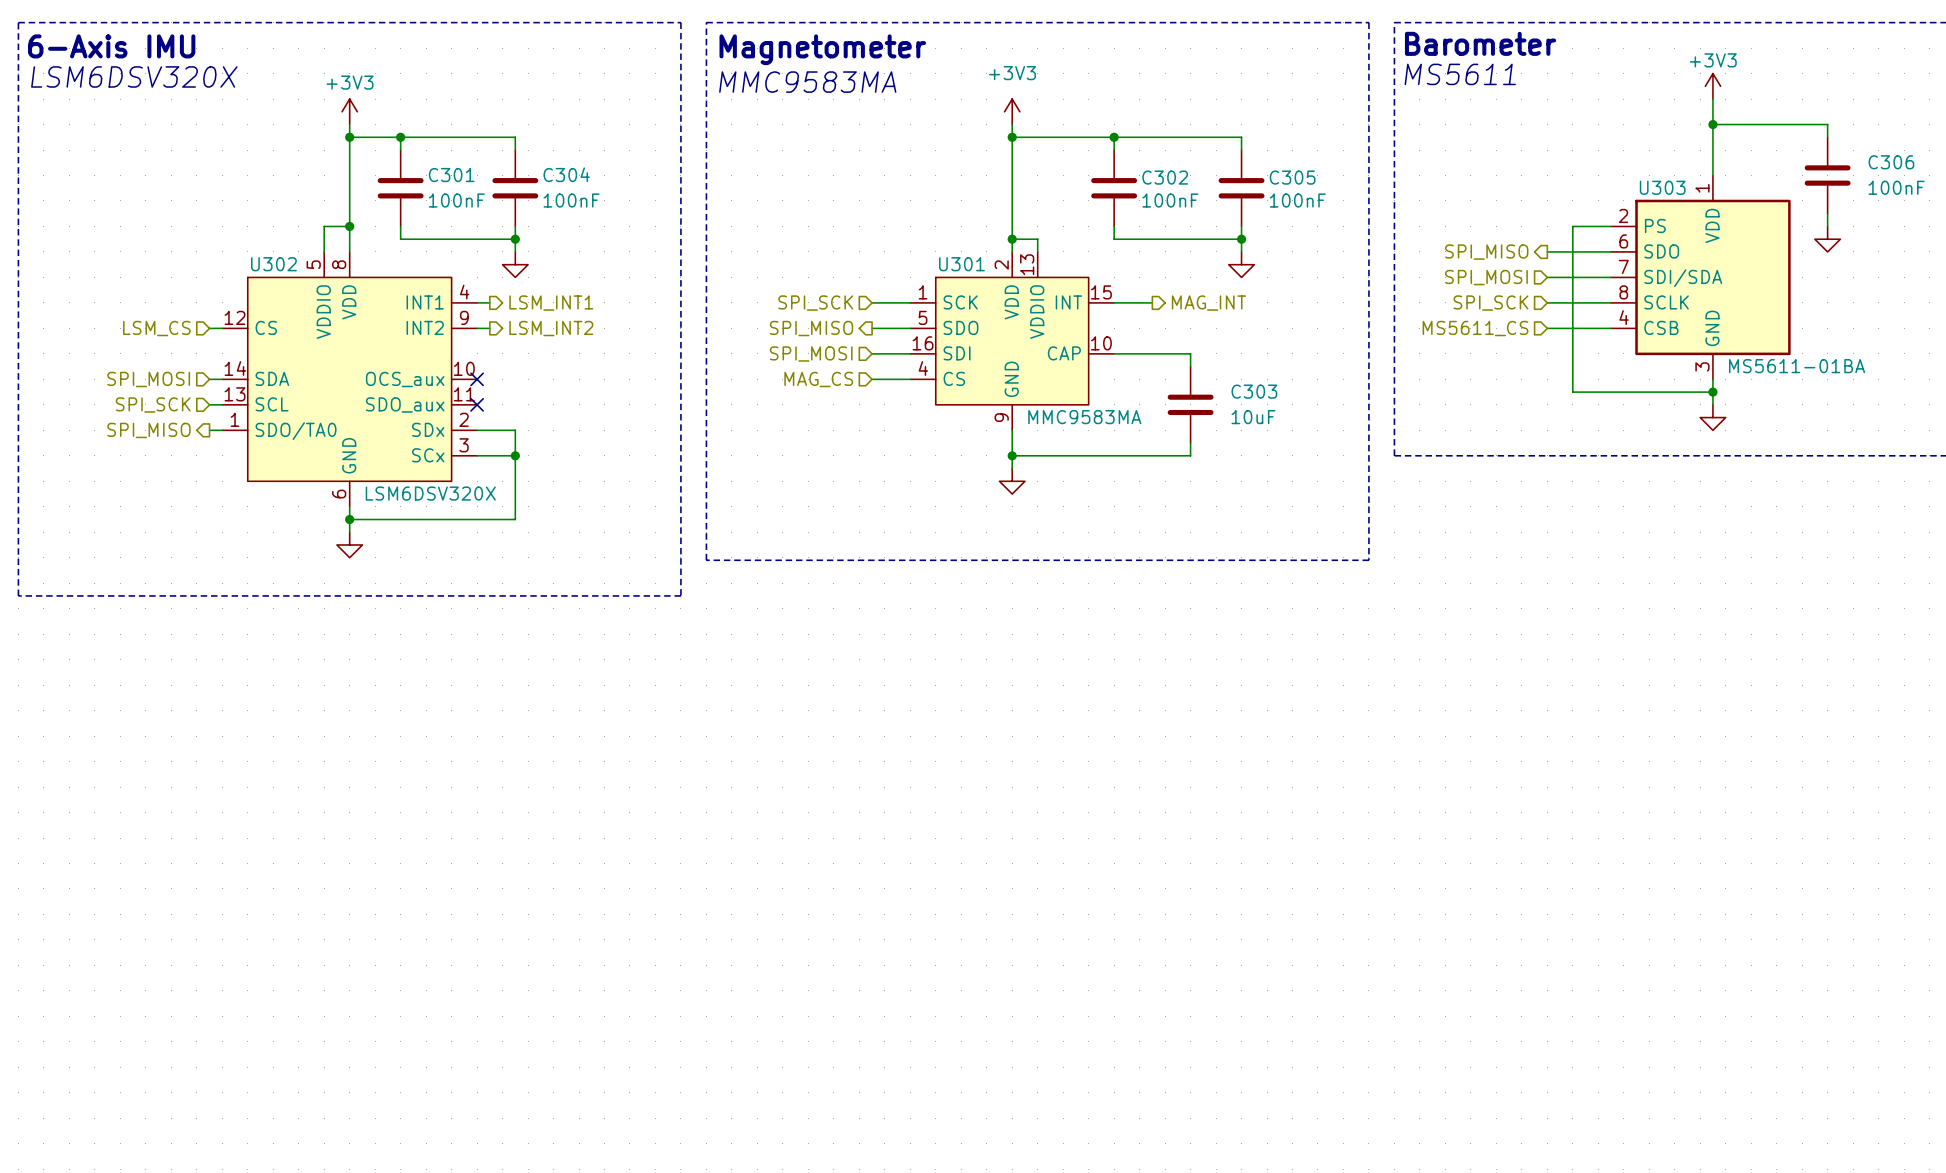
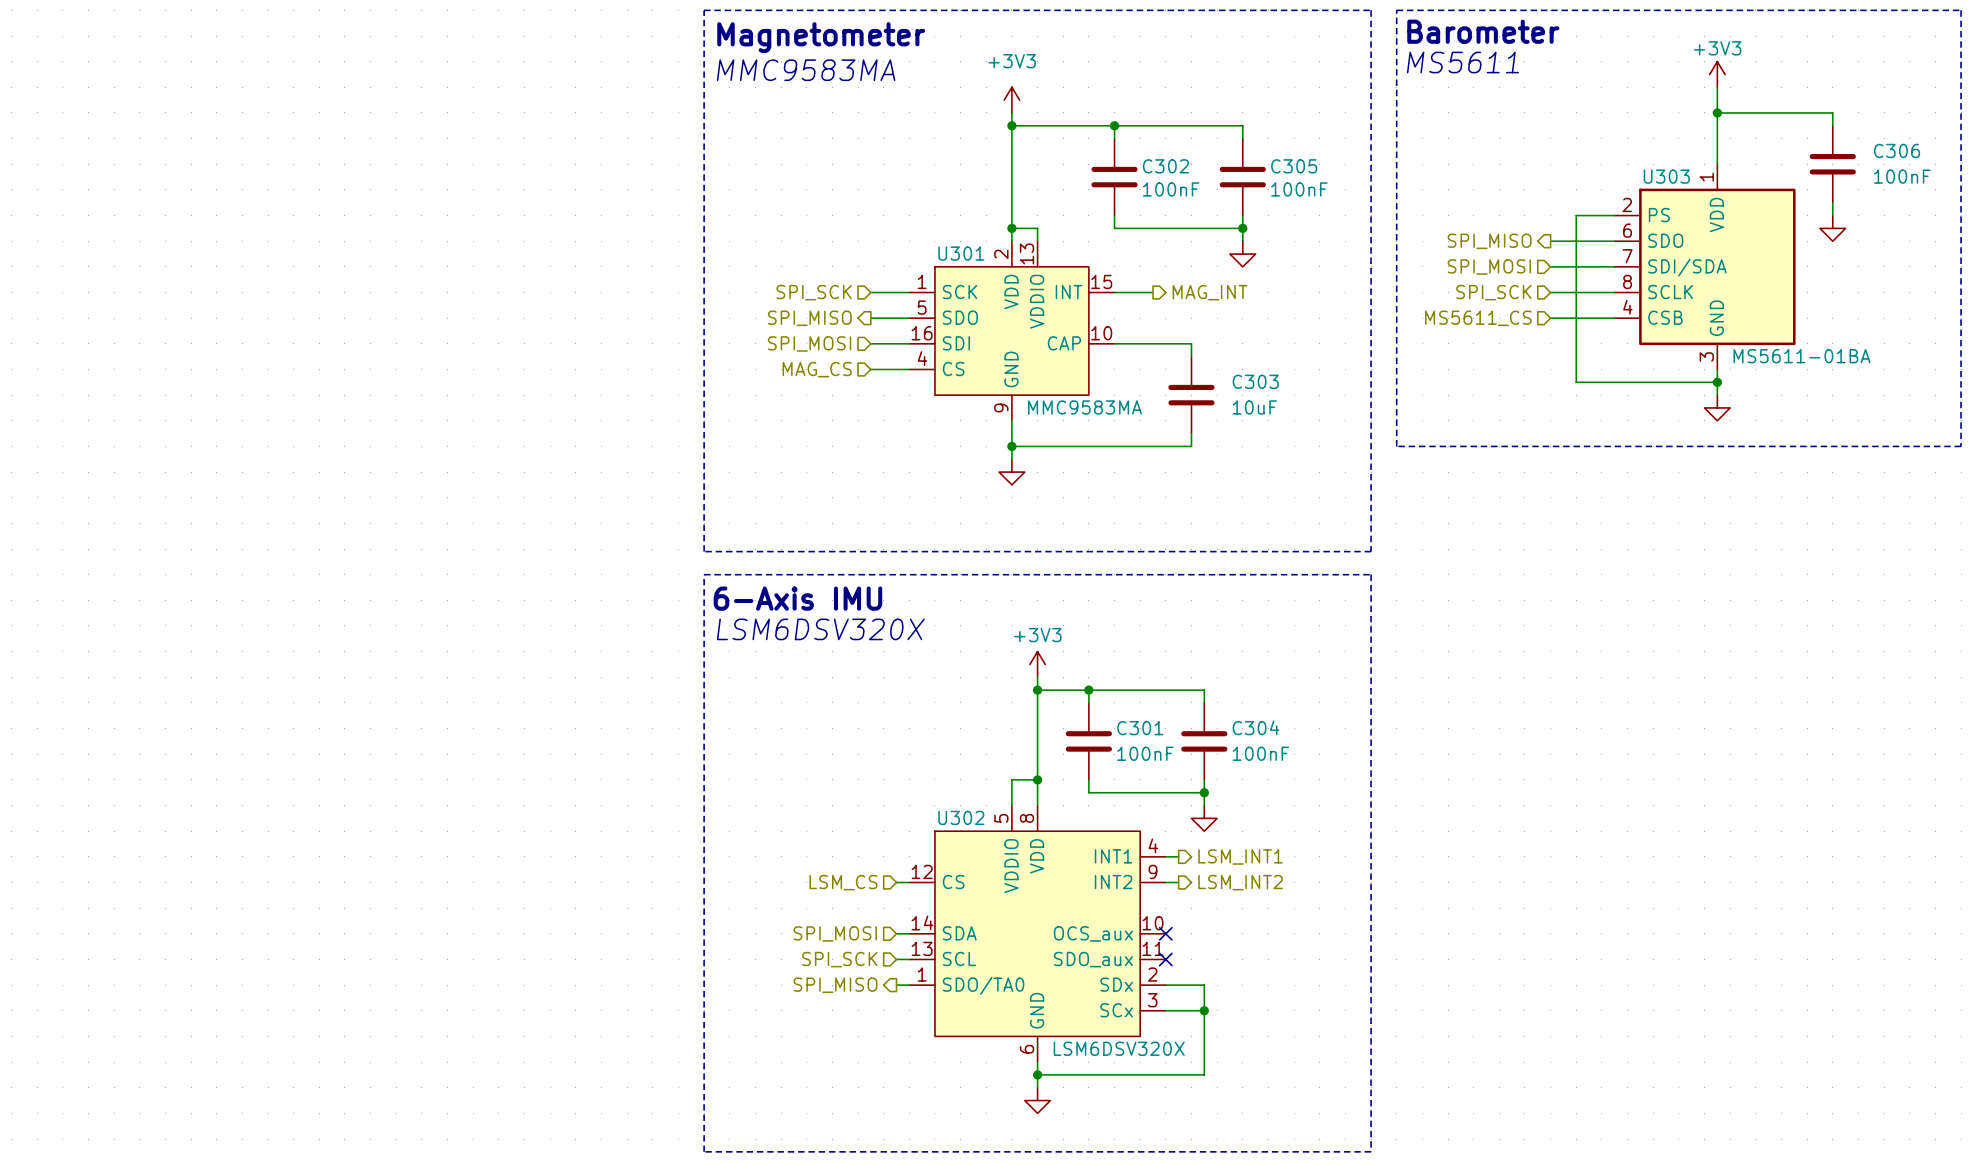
line: (18, 22) (680, 22) (680, 595) (18, 595) (18, 22) -> none
text: 6-Axis IMU (111, 46) -> none
text: LSM6DSV320X (134, 76) -> none
power symbol: +3V3 (349, 111) -> none
wire: (349, 124) (349, 251) -> none
wire: (349, 137) (515, 137) (515, 150) -> none
junction: (349, 137) -> none
wire: (400, 137) (400, 150) -> none
junction: (400, 137) -> none
C301 position: (400, 188) -> (1088, 741)
C304 position: (515, 188) -> (1204, 741)
wire: (349, 226) (324, 226) (324, 251) -> none
junction: (349, 226) -> none
wire: (400, 226) (400, 239) (515, 239) -> none
wire: (515, 226) (515, 251) -> none
junction: (515, 239) -> none
power symbol: (515, 264) -> none
wire: (477, 302) (489, 302) -> none
hierarchical label: LSM_INT1 (551, 303) -> none
hierarchical label: LSM_CS (156, 328) -> none
wire: (209, 328) (222, 328) -> none
wire: (477, 328) (489, 328) -> none
hierarchical label: LSM_INT2 (551, 328) -> none
hierarchical label: SPI_MOSI (148, 379) -> none
wire: (209, 379) (222, 379) -> none
U302 position: (349, 379) -> (1037, 933)
no-connect mark: (477, 379) -> none
hierarchical label: SPI_SCK (153, 404) -> none
wire: (209, 404) (222, 404) -> none
no-connect mark: (477, 404) -> none
hierarchical label: SPI_MISO (148, 430) -> none
wire: (209, 430) (222, 430) -> none
wire: (477, 430) (515, 430) (515, 519) (349, 519) -> none
wire: (477, 455) (515, 455) -> none
junction: (515, 455) -> none
wire: (349, 506) (349, 532) -> none
junction: (349, 519) -> none
power symbol: (349, 544) -> none
line: none -> (704, 574) (1371, 574) (1371, 1151) (704, 1151) (704, 574)
text: none -> 6-Axis IMU (797, 598)
text: none -> LSM6DSV320X (820, 629)
power symbol: none -> +3V3 (1037, 664)
wire: none -> (1037, 677) (1037, 805)
wire: none -> (1037, 690) (1204, 690) (1204, 702)
junction: none -> (1037, 690)
wire: none -> (1088, 690) (1088, 702)
junction: none -> (1088, 690)
wire: none -> (1037, 779) (1011, 779) (1011, 805)
junction: none -> (1037, 779)
wire: none -> (1088, 779) (1088, 792) (1204, 792)
wire: none -> (1204, 779) (1204, 805)
junction: none -> (1204, 792)
power symbol: none -> (1204, 818)
wire: none -> (1165, 856) (1178, 856)
hierarchical label: none -> LSM_INT1 (1240, 856)
wire: none -> (896, 882) (909, 882)
wire: none -> (1165, 882) (1178, 882)
hierarchical label: none -> LSM_CS (843, 882)
hierarchical label: none -> LSM_INT2 (1240, 882)
wire: none -> (896, 933) (909, 933)
no-connect mark: none -> (1165, 933)
hierarchical label: none -> SPI_MOSI (835, 933)
hierarchical label: none -> SPI_SCK (839, 959)
wire: none -> (896, 959) (909, 959)
no-connect mark: none -> (1165, 959)
wire: none -> (896, 985) (909, 985)
wire: none -> (1165, 985) (1204, 985) (1204, 1074) (1037, 1074)
hierarchical label: none -> SPI_MISO (835, 985)
wire: none -> (1165, 1010) (1204, 1010)
junction: none -> (1204, 1010)
wire: none -> (1037, 1062) (1037, 1087)
junction: none -> (1037, 1074)
power symbol: none -> (1037, 1100)

